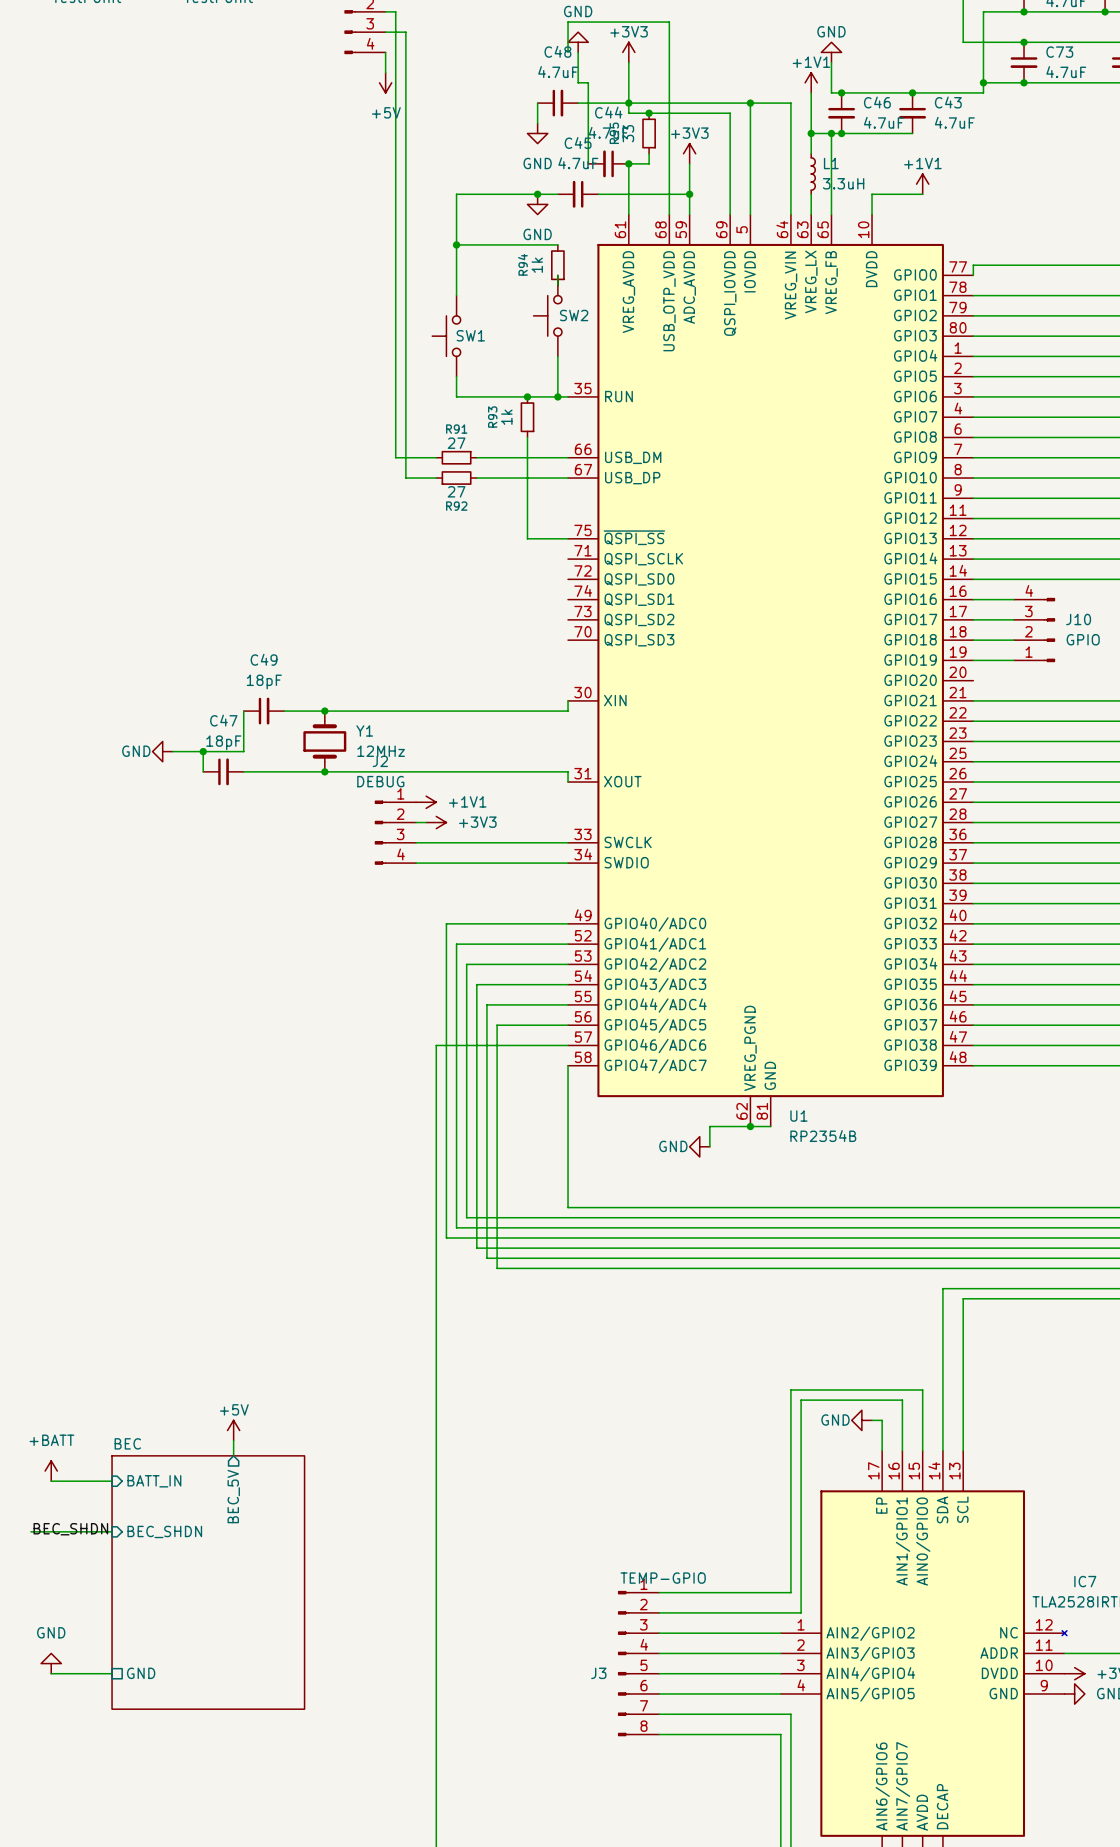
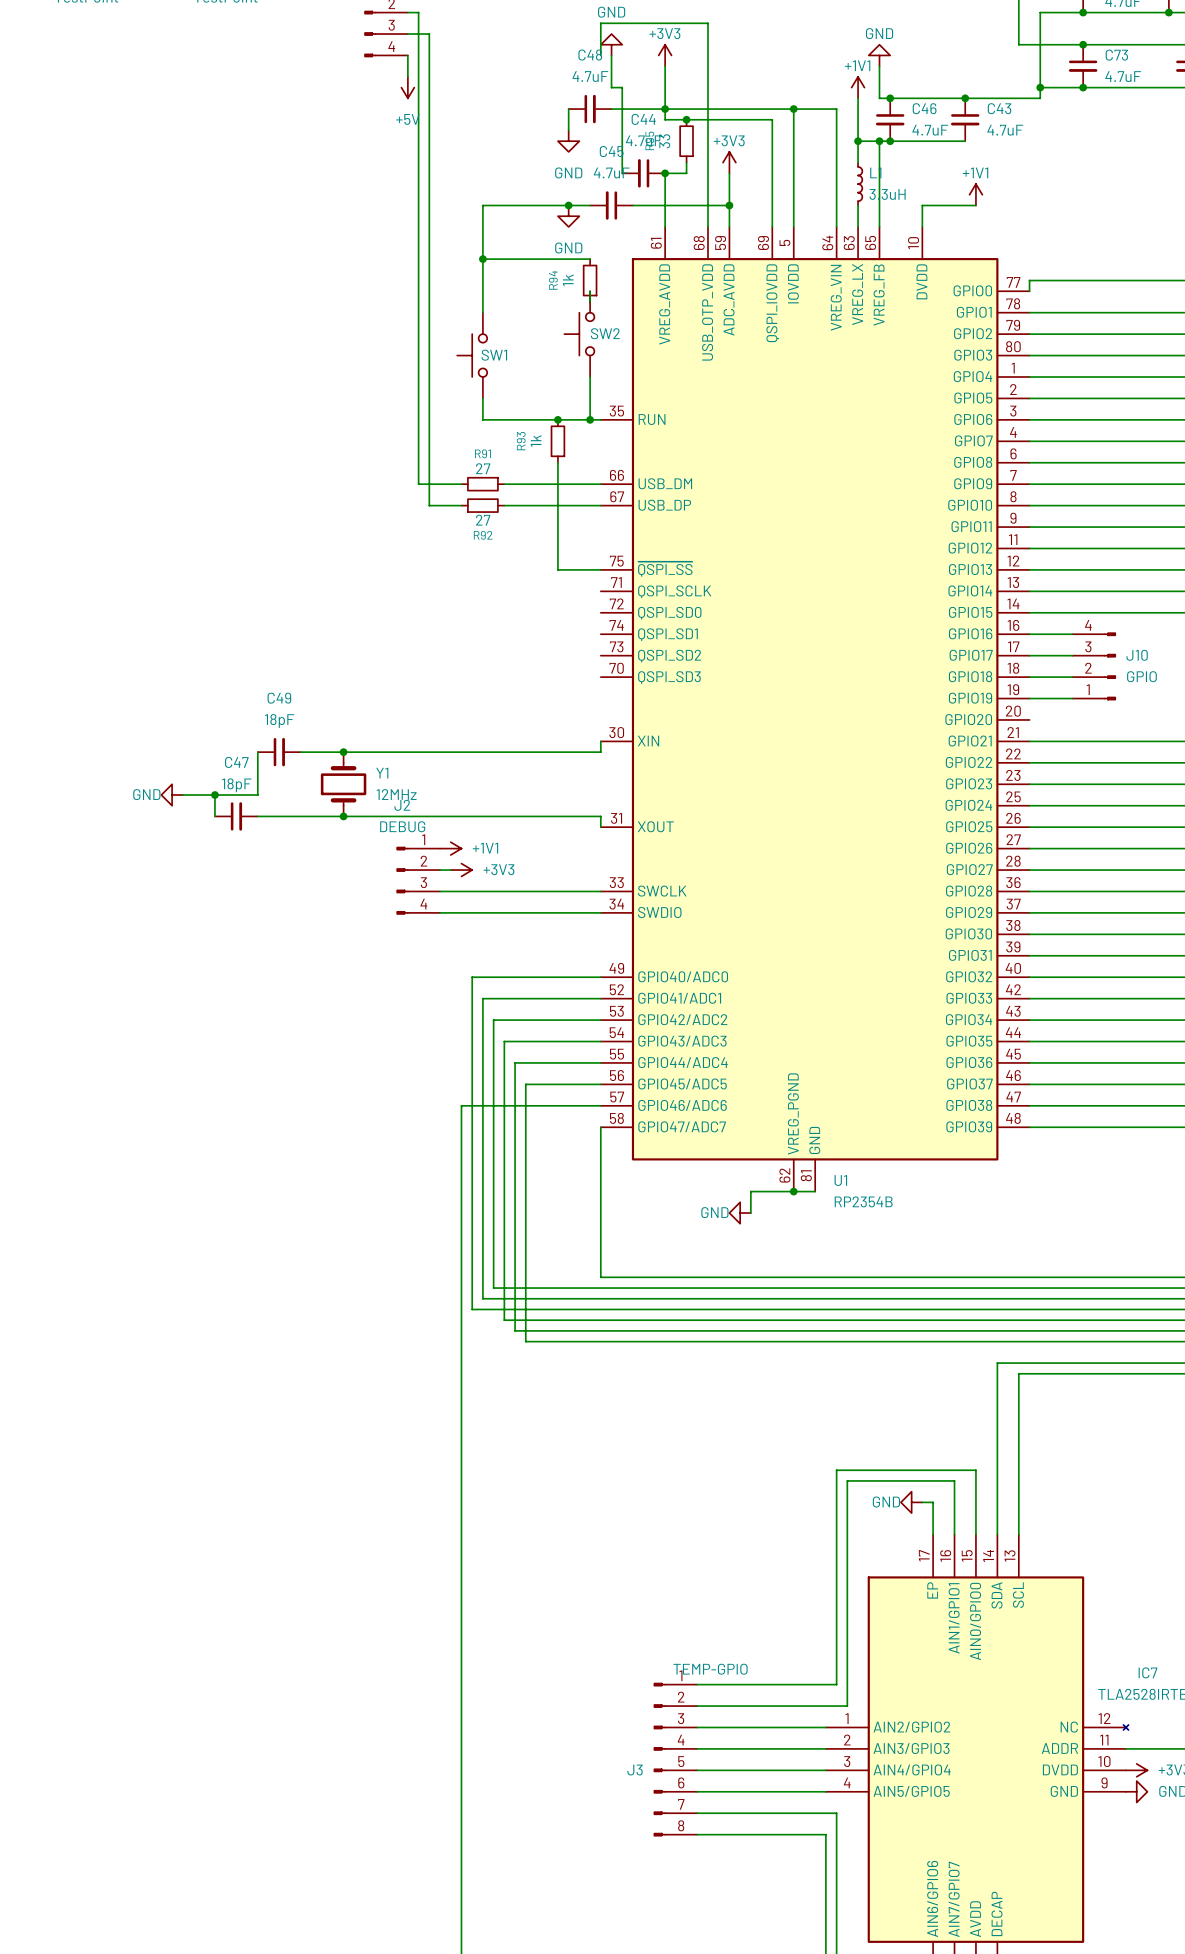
power symbol: +5V (233, 1430) -> none
wire: (233, 1440) (233, 1455) -> none
power symbol: +BATT (51, 1471) -> none
wire: (51, 1481) (112, 1481) -> none
sheet pin: BATT_IN (154, 1481) -> none
sheet pin: BEC_5V (233, 1496) -> none
label: BEC_SHDN (70, 1529) -> none
wire: (30, 1531) (112, 1531) -> none
sheet pin: BEC_SHDN (164, 1531) -> none
sheet BEC: (208, 1582) -> none
power symbol: GND (51, 1663) -> none
wire: (51, 1673) (112, 1673) -> none
sheet pin: GND (141, 1673) -> none

